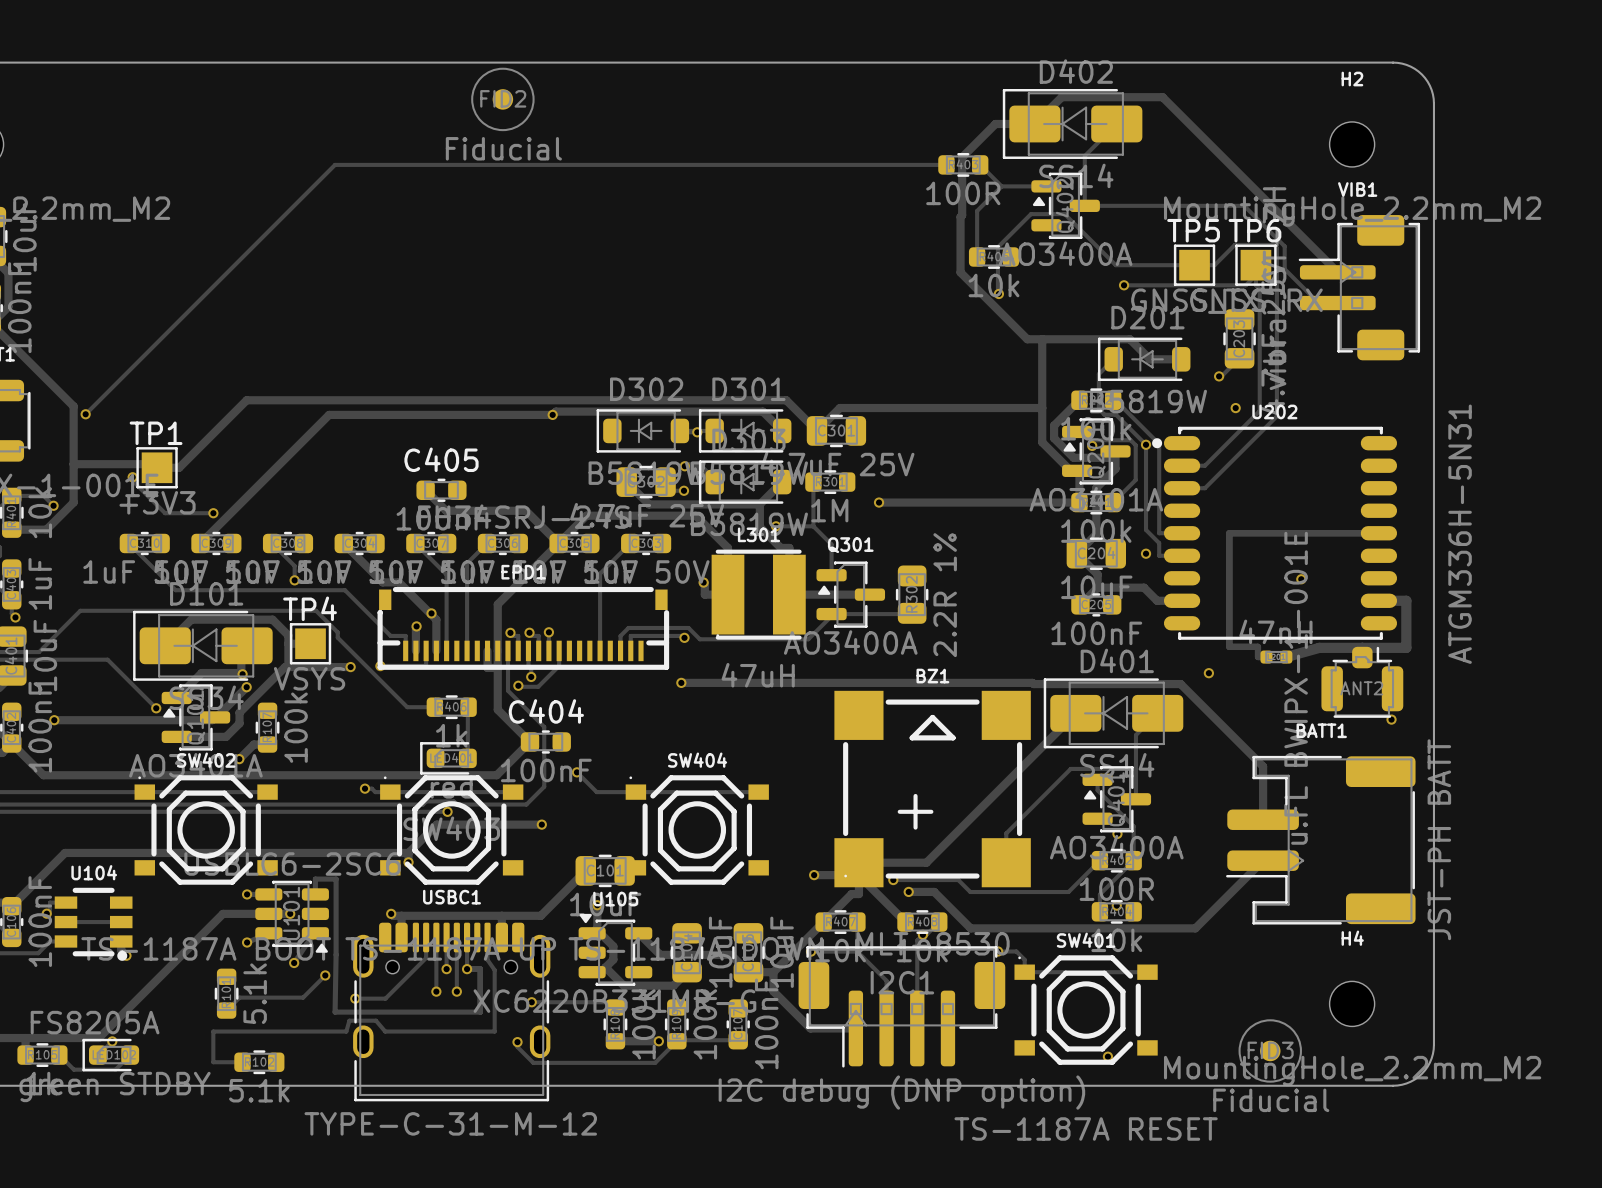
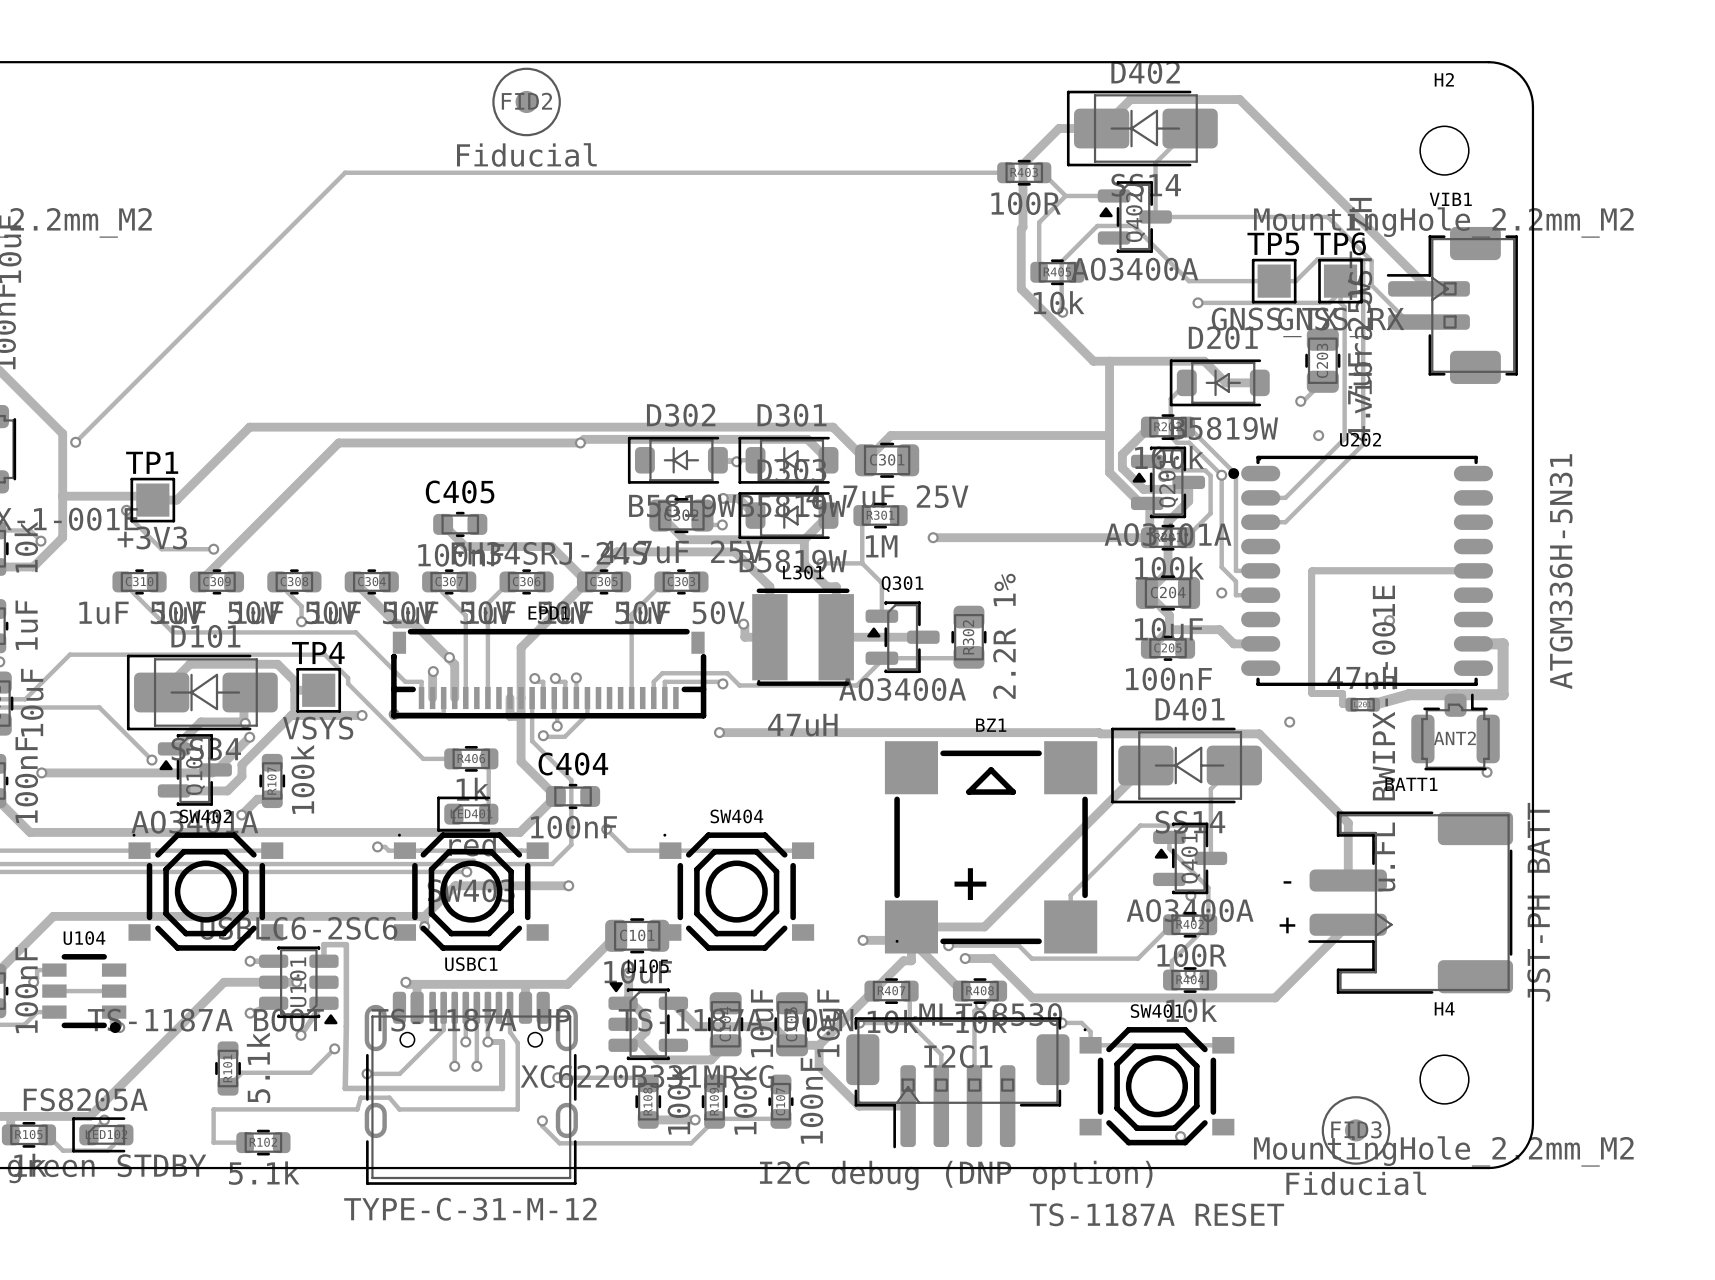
text: none -> - (1287, 882)
text: none -> + (1287, 925)

